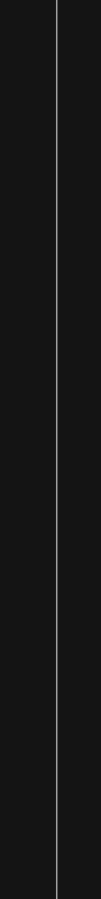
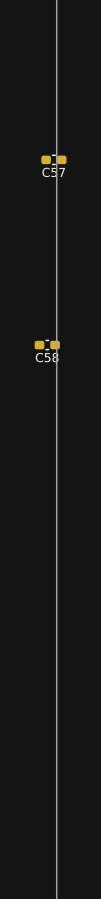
C57: none -> (53, 159)
C58: none -> (47, 345)

